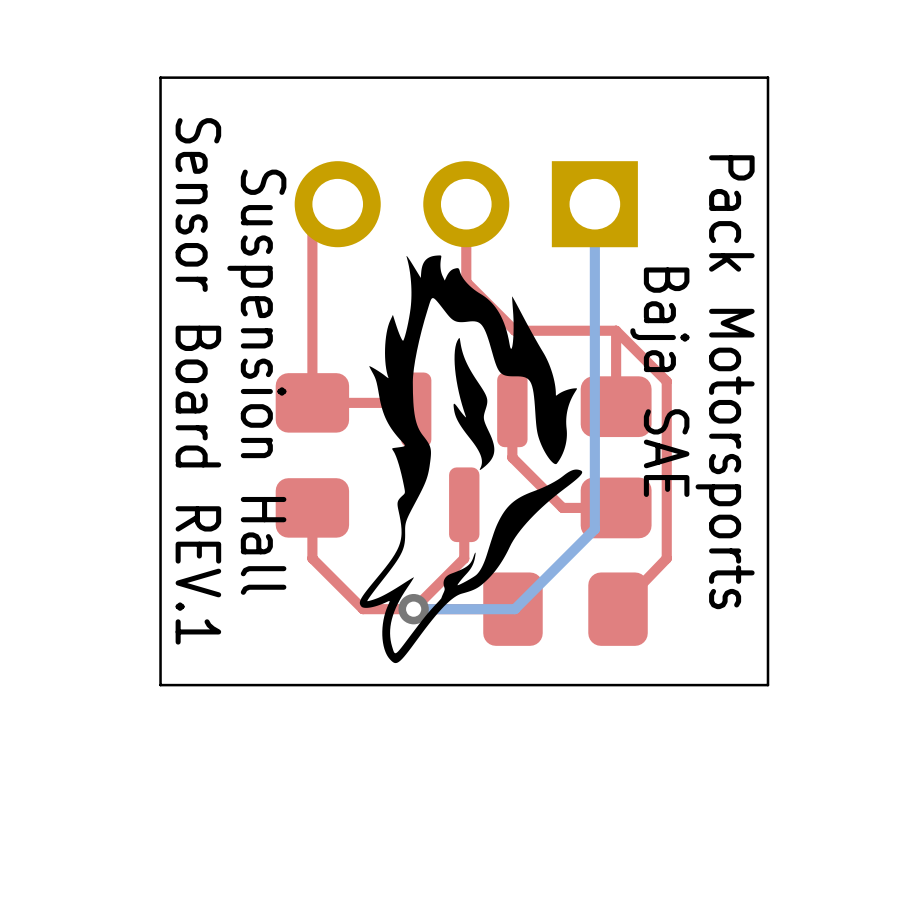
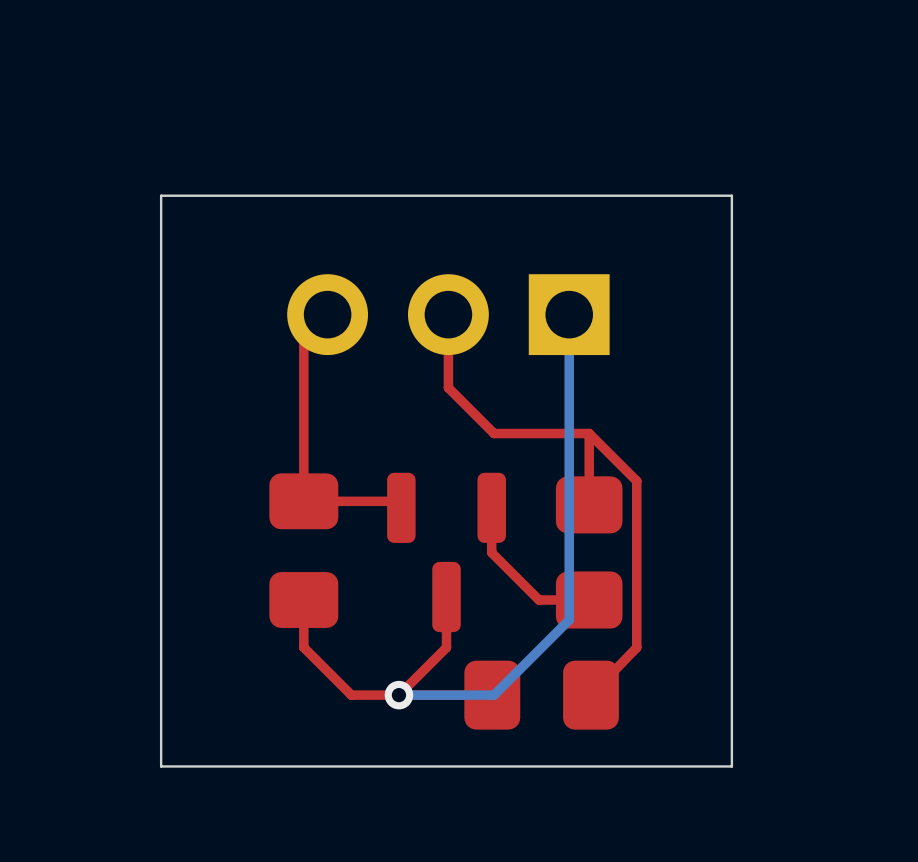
drawing: [359, 255, 583, 664] -> none
text: Sensor Board REV.1 (198, 381) -> none
text: Suspension Hall (256, 382) -> none
text: Baja SAE (659, 382) -> none
text: Pack Motorsports (725, 382) -> none

